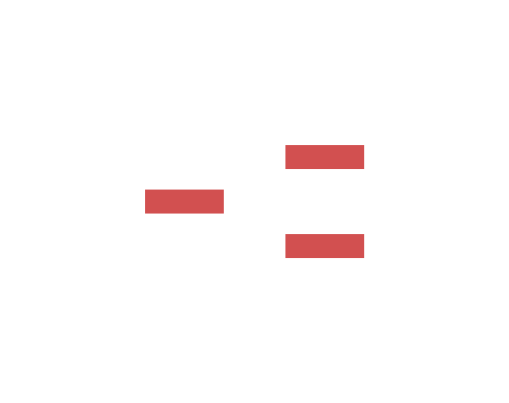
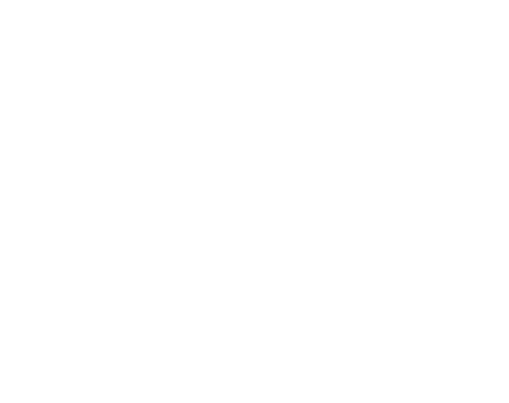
part: (254, 201) -> none

